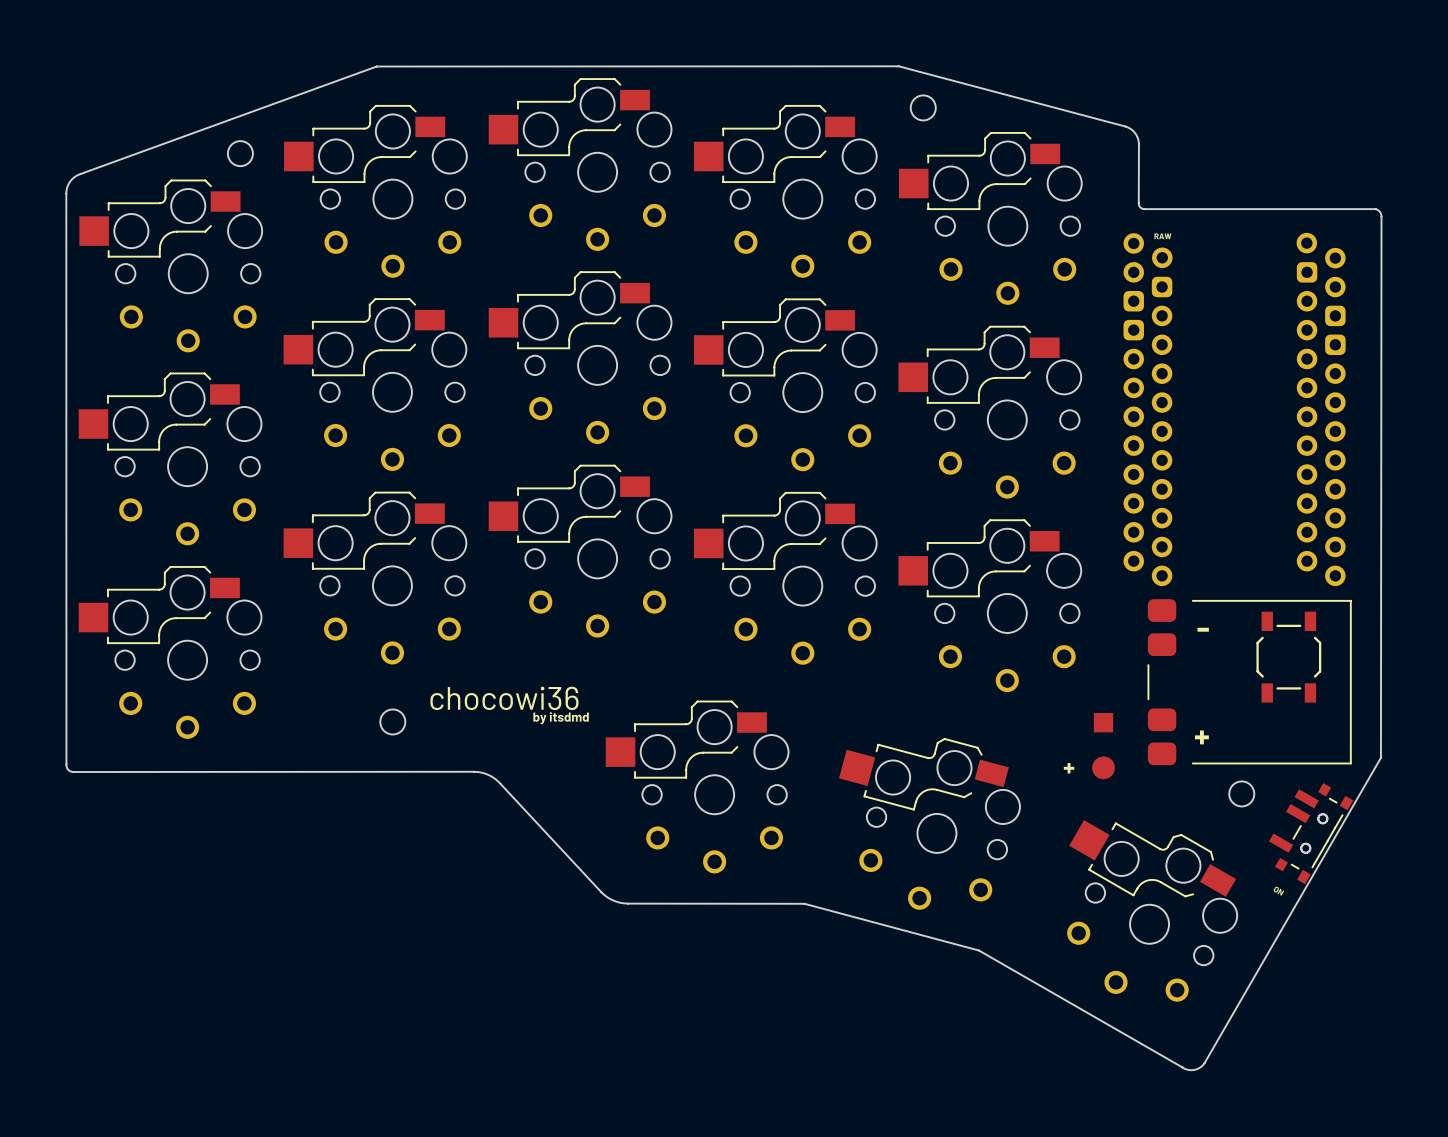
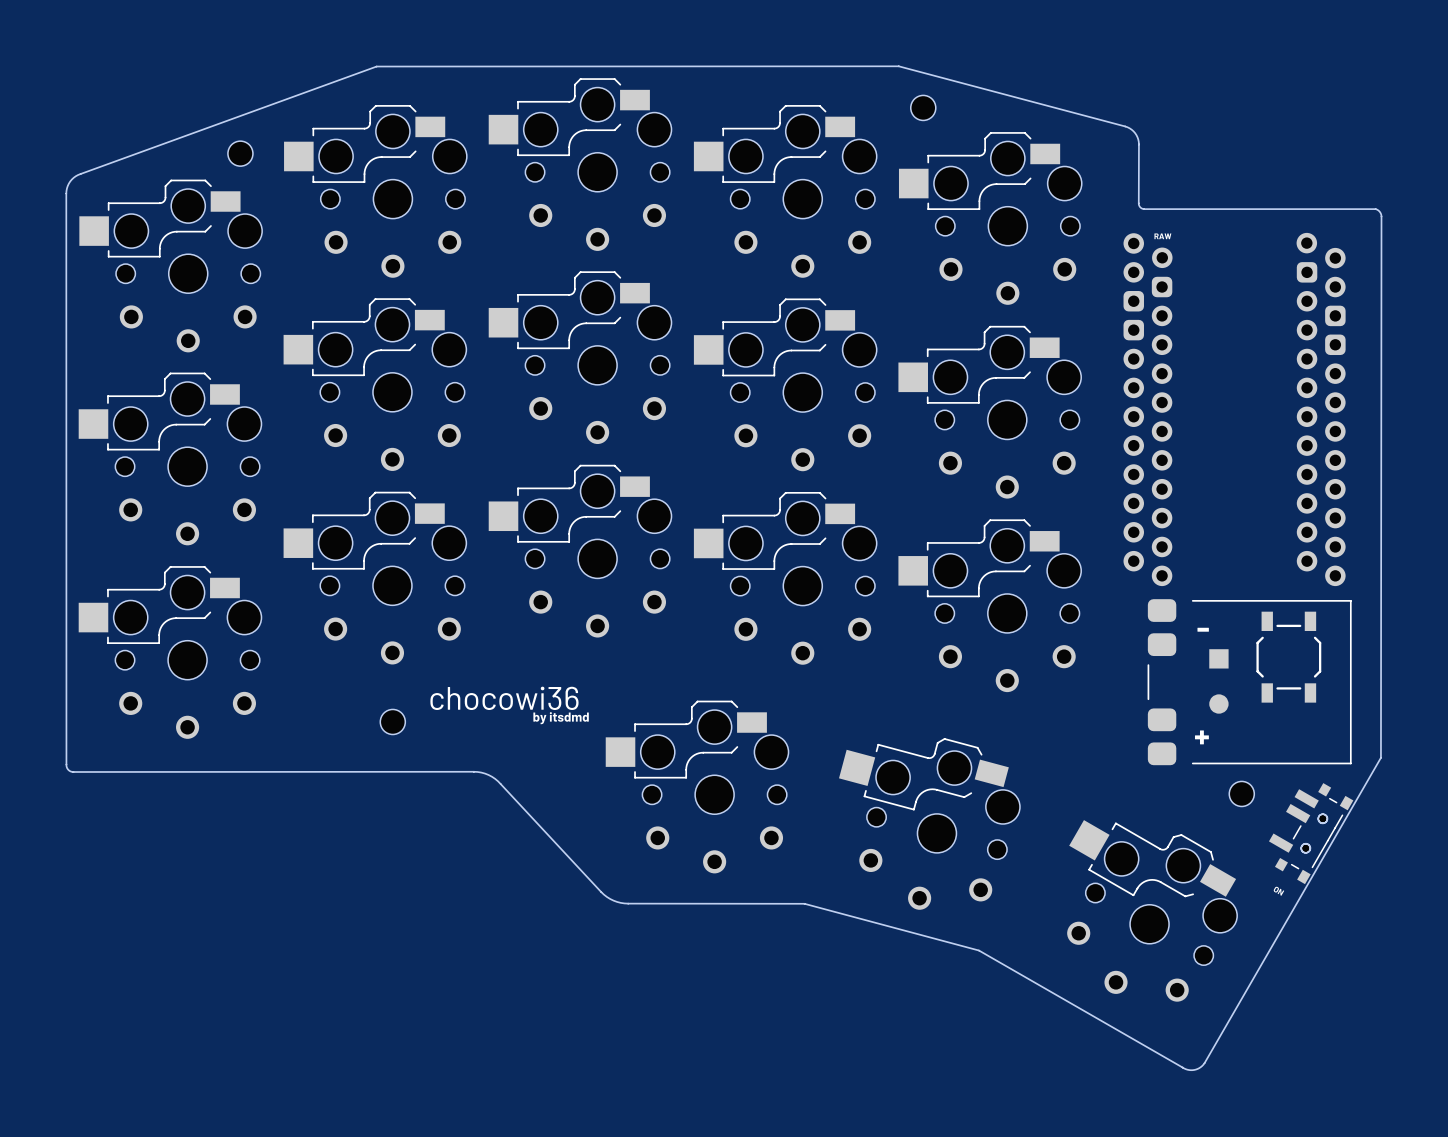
part: none -> (1218, 681)
part: (1103, 746) -> none
text: + (1069, 768) -> none

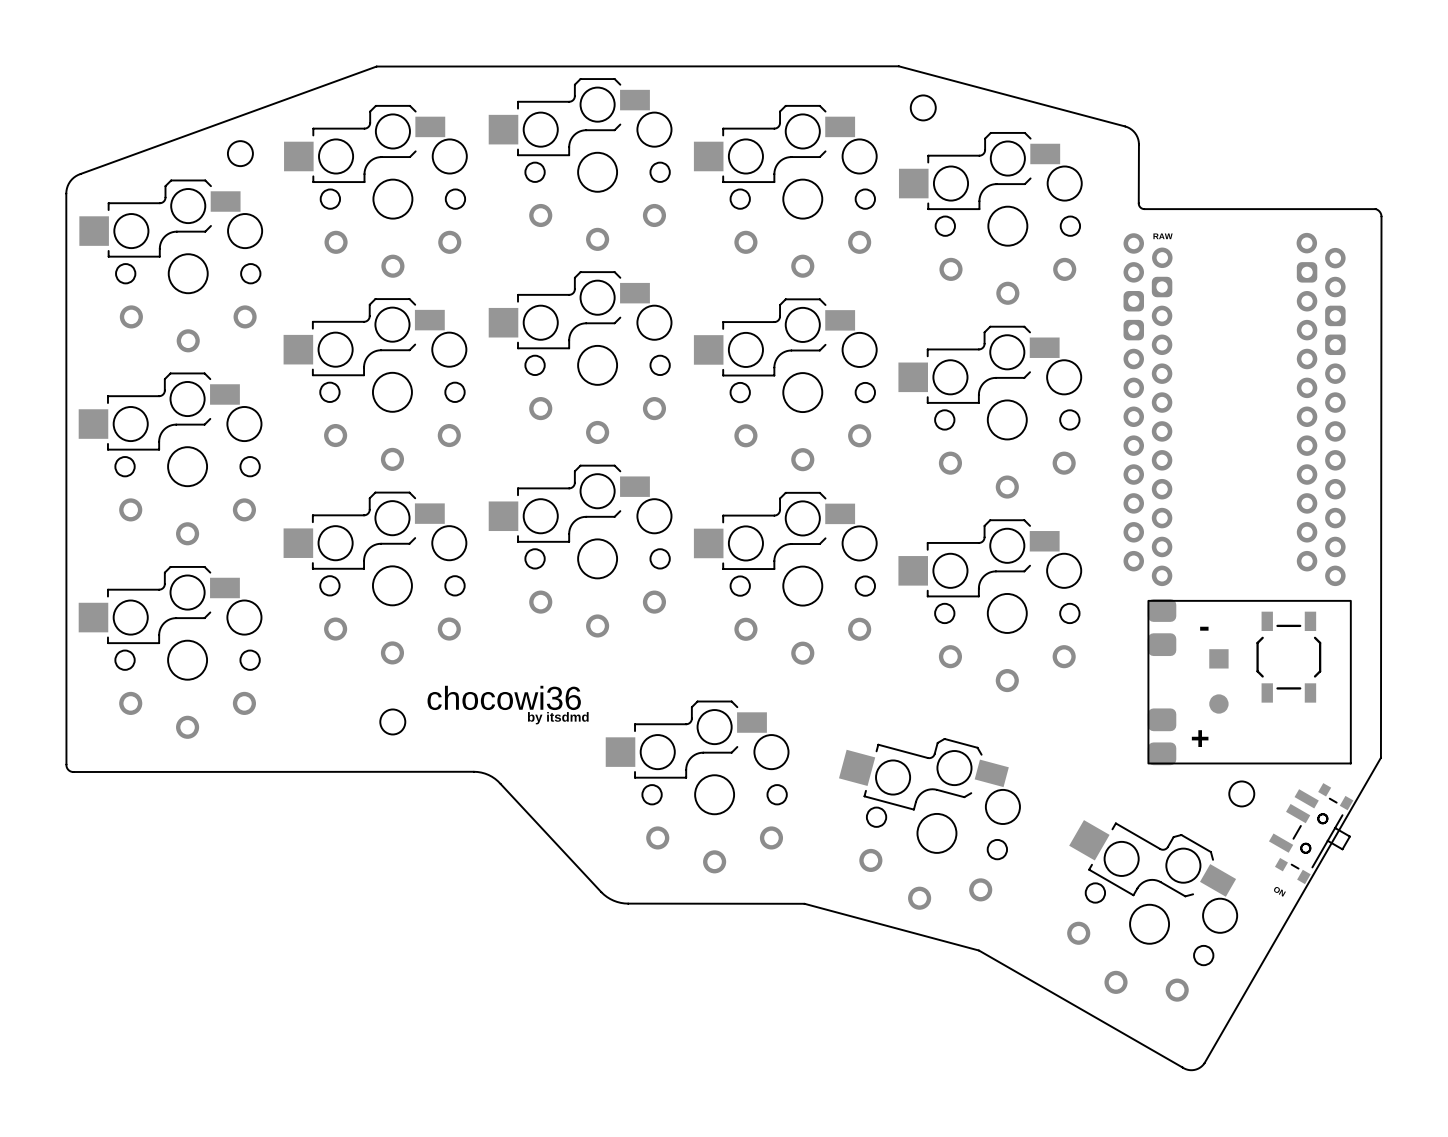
part footprint: [1147, 599, 1352, 766] -> [1147, 599, 1352, 766]
part footprint: [1268, 783, 1354, 885] -> [1268, 783, 1354, 885]

